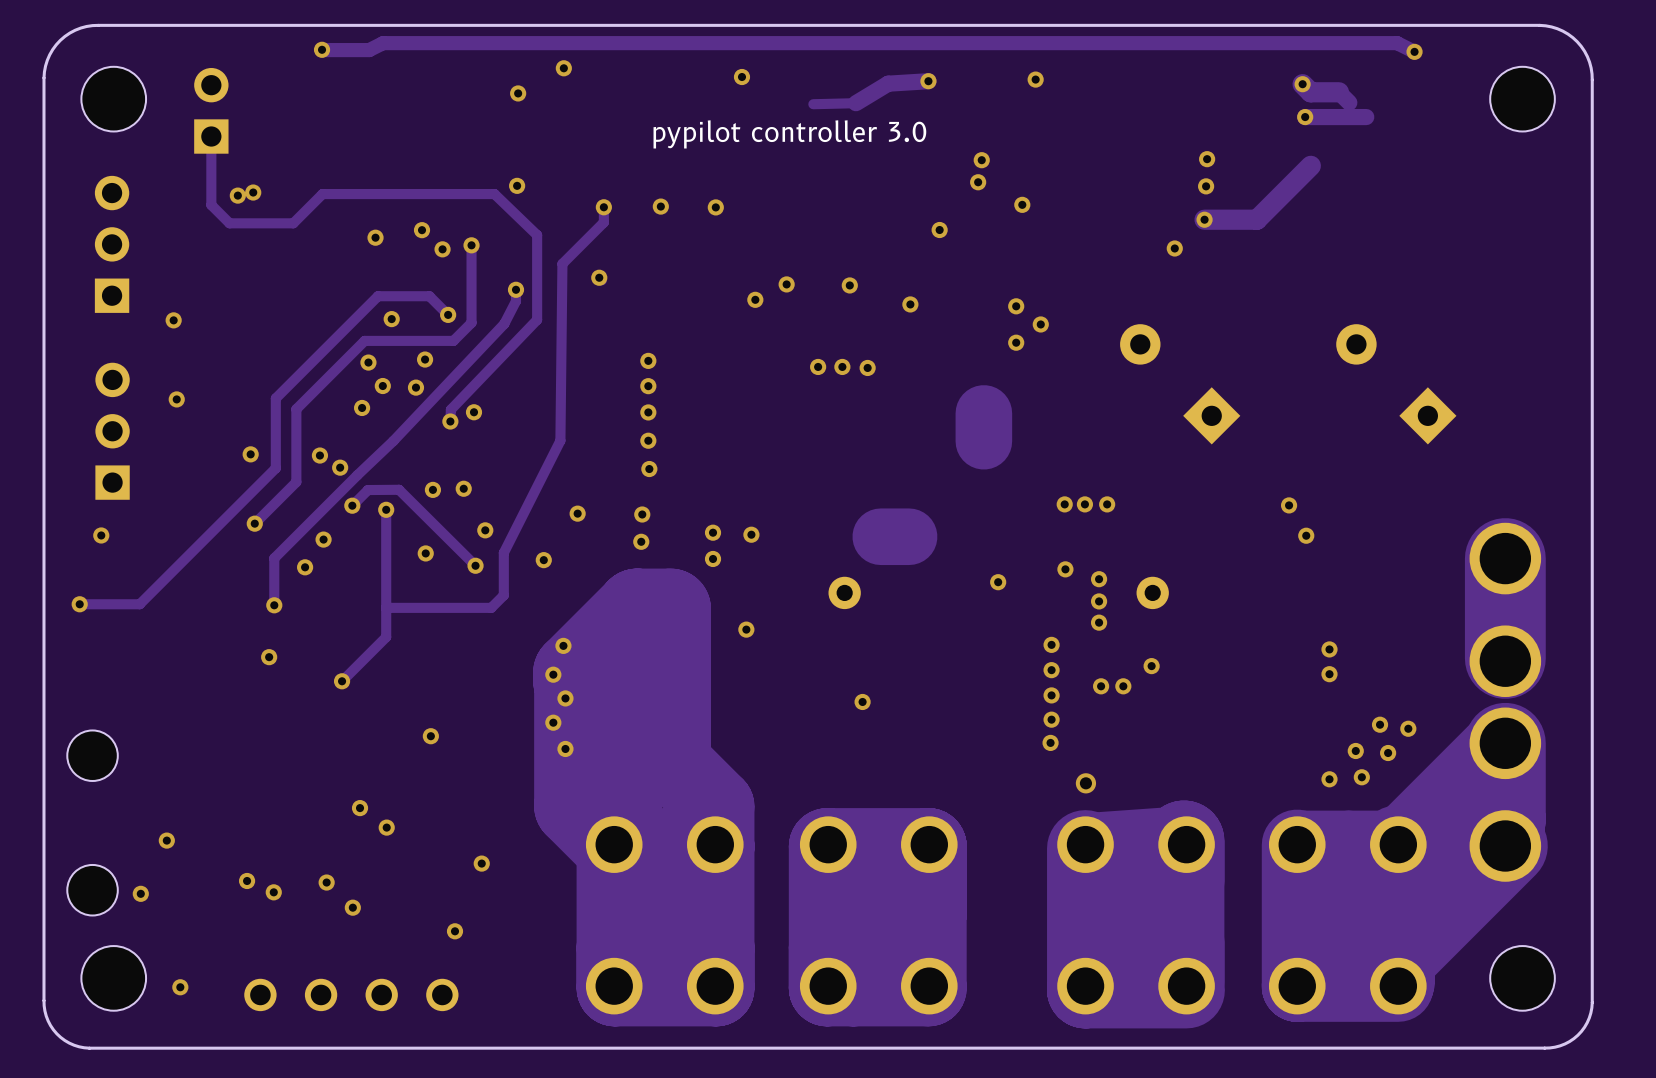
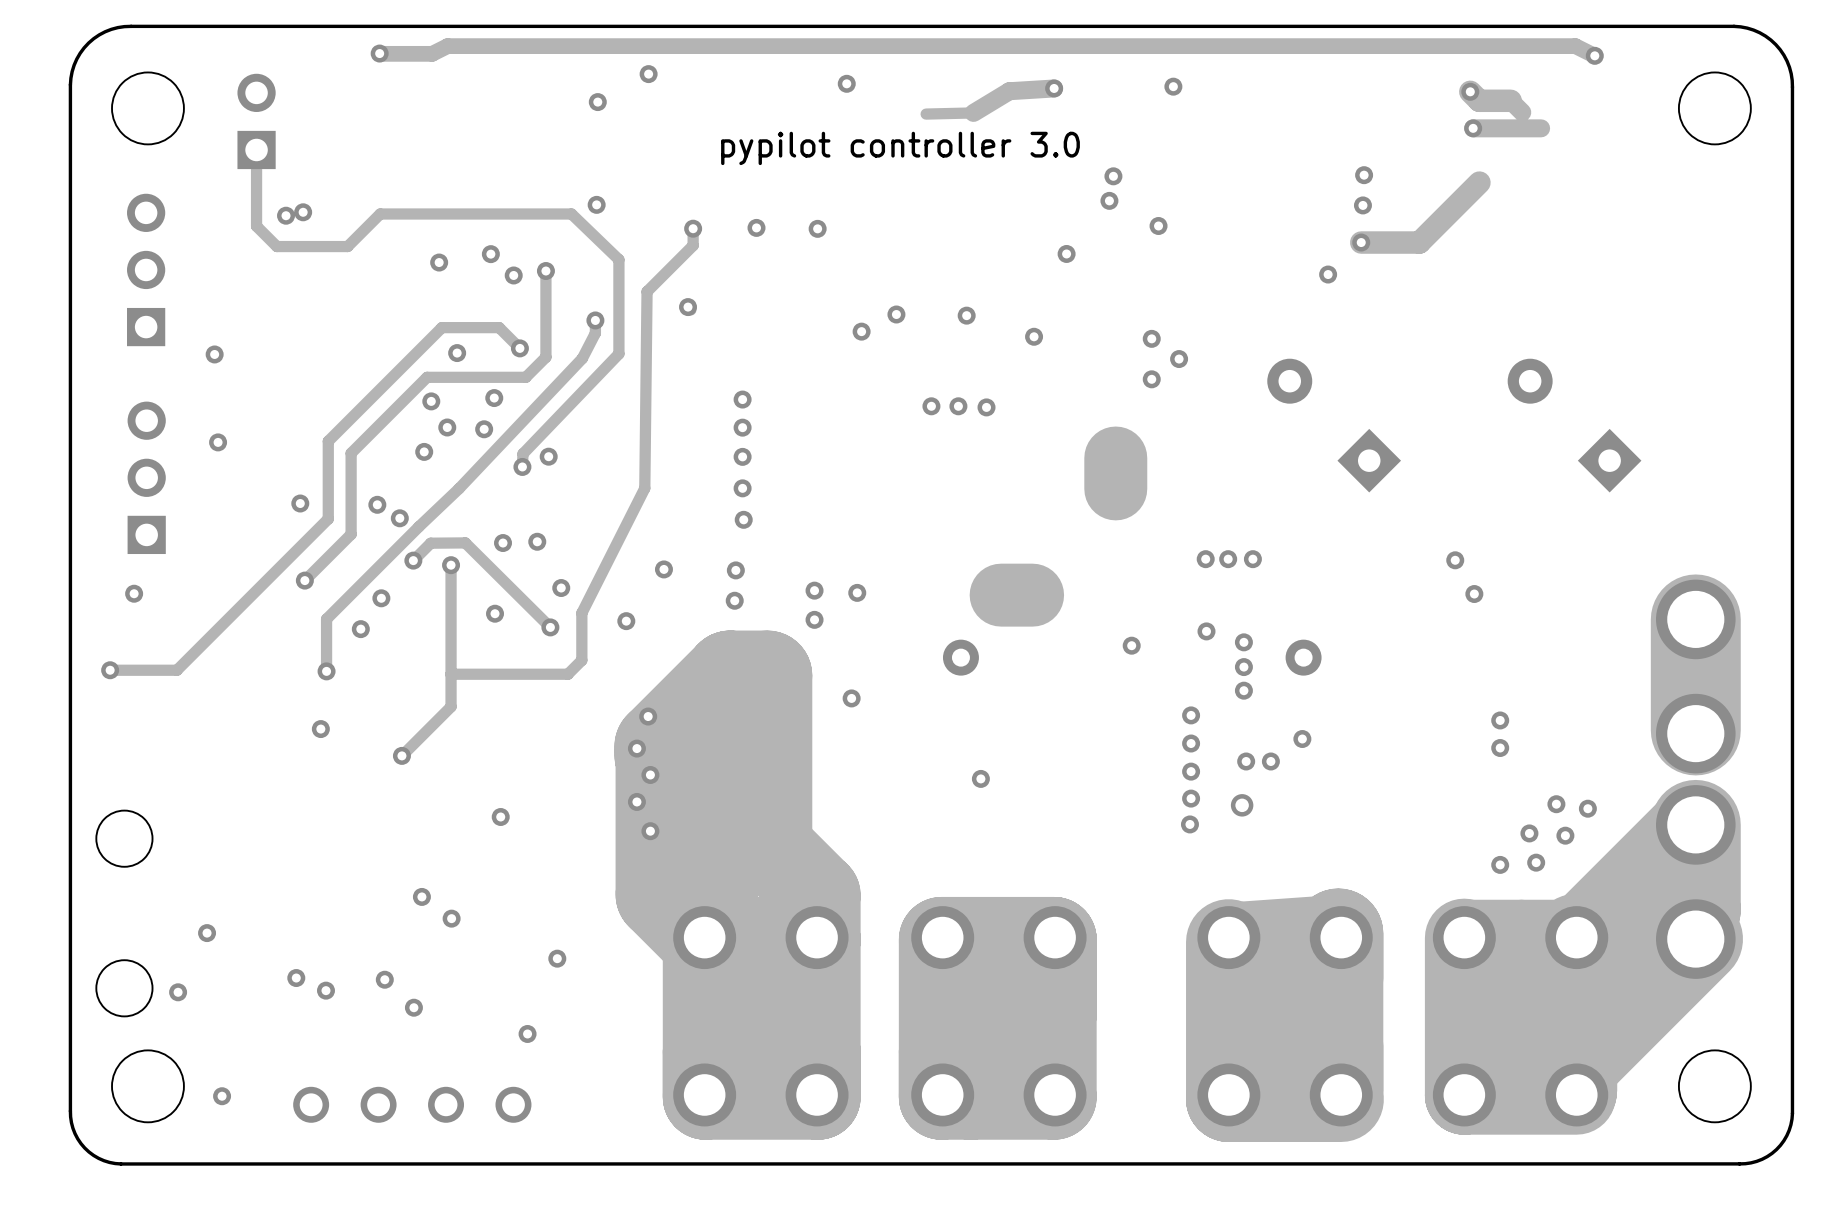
via position: (1085, 783) -> (1242, 805)

